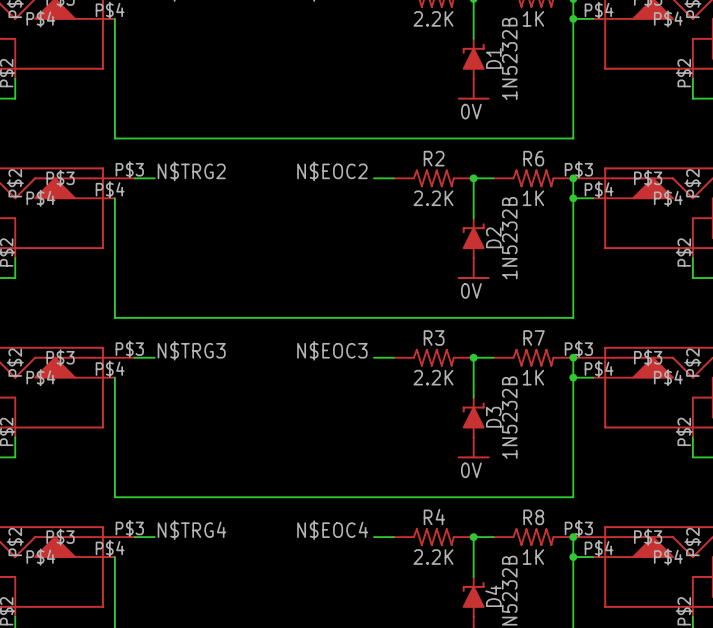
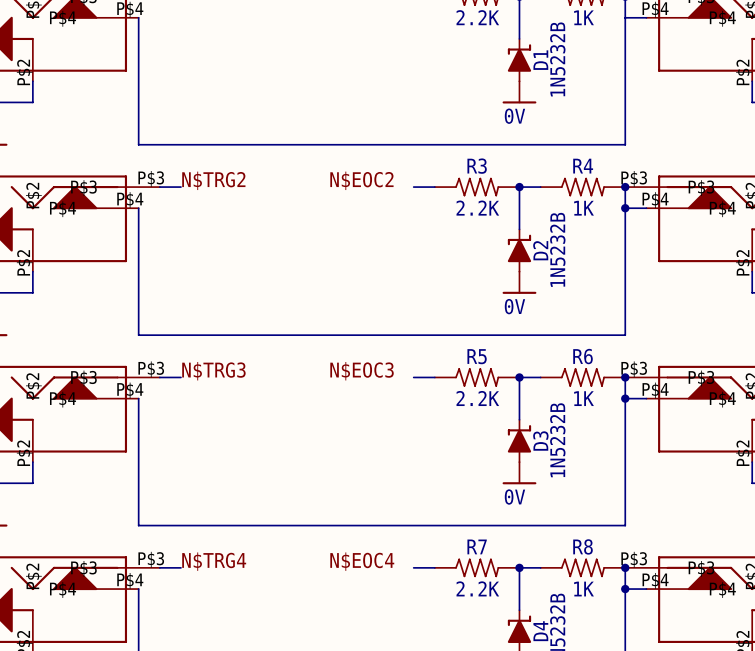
junction: (573, 18) -> none
R2 name: R2 (434, 158) -> R3 (477, 166)
R6 name: R6 (533, 158) -> R4 (583, 166)
R3 name: R3 (434, 338) -> R5 (477, 356)
R7 name: R7 (534, 338) -> R6 (583, 356)
R4 name: R4 (434, 517) -> R7 (477, 546)

